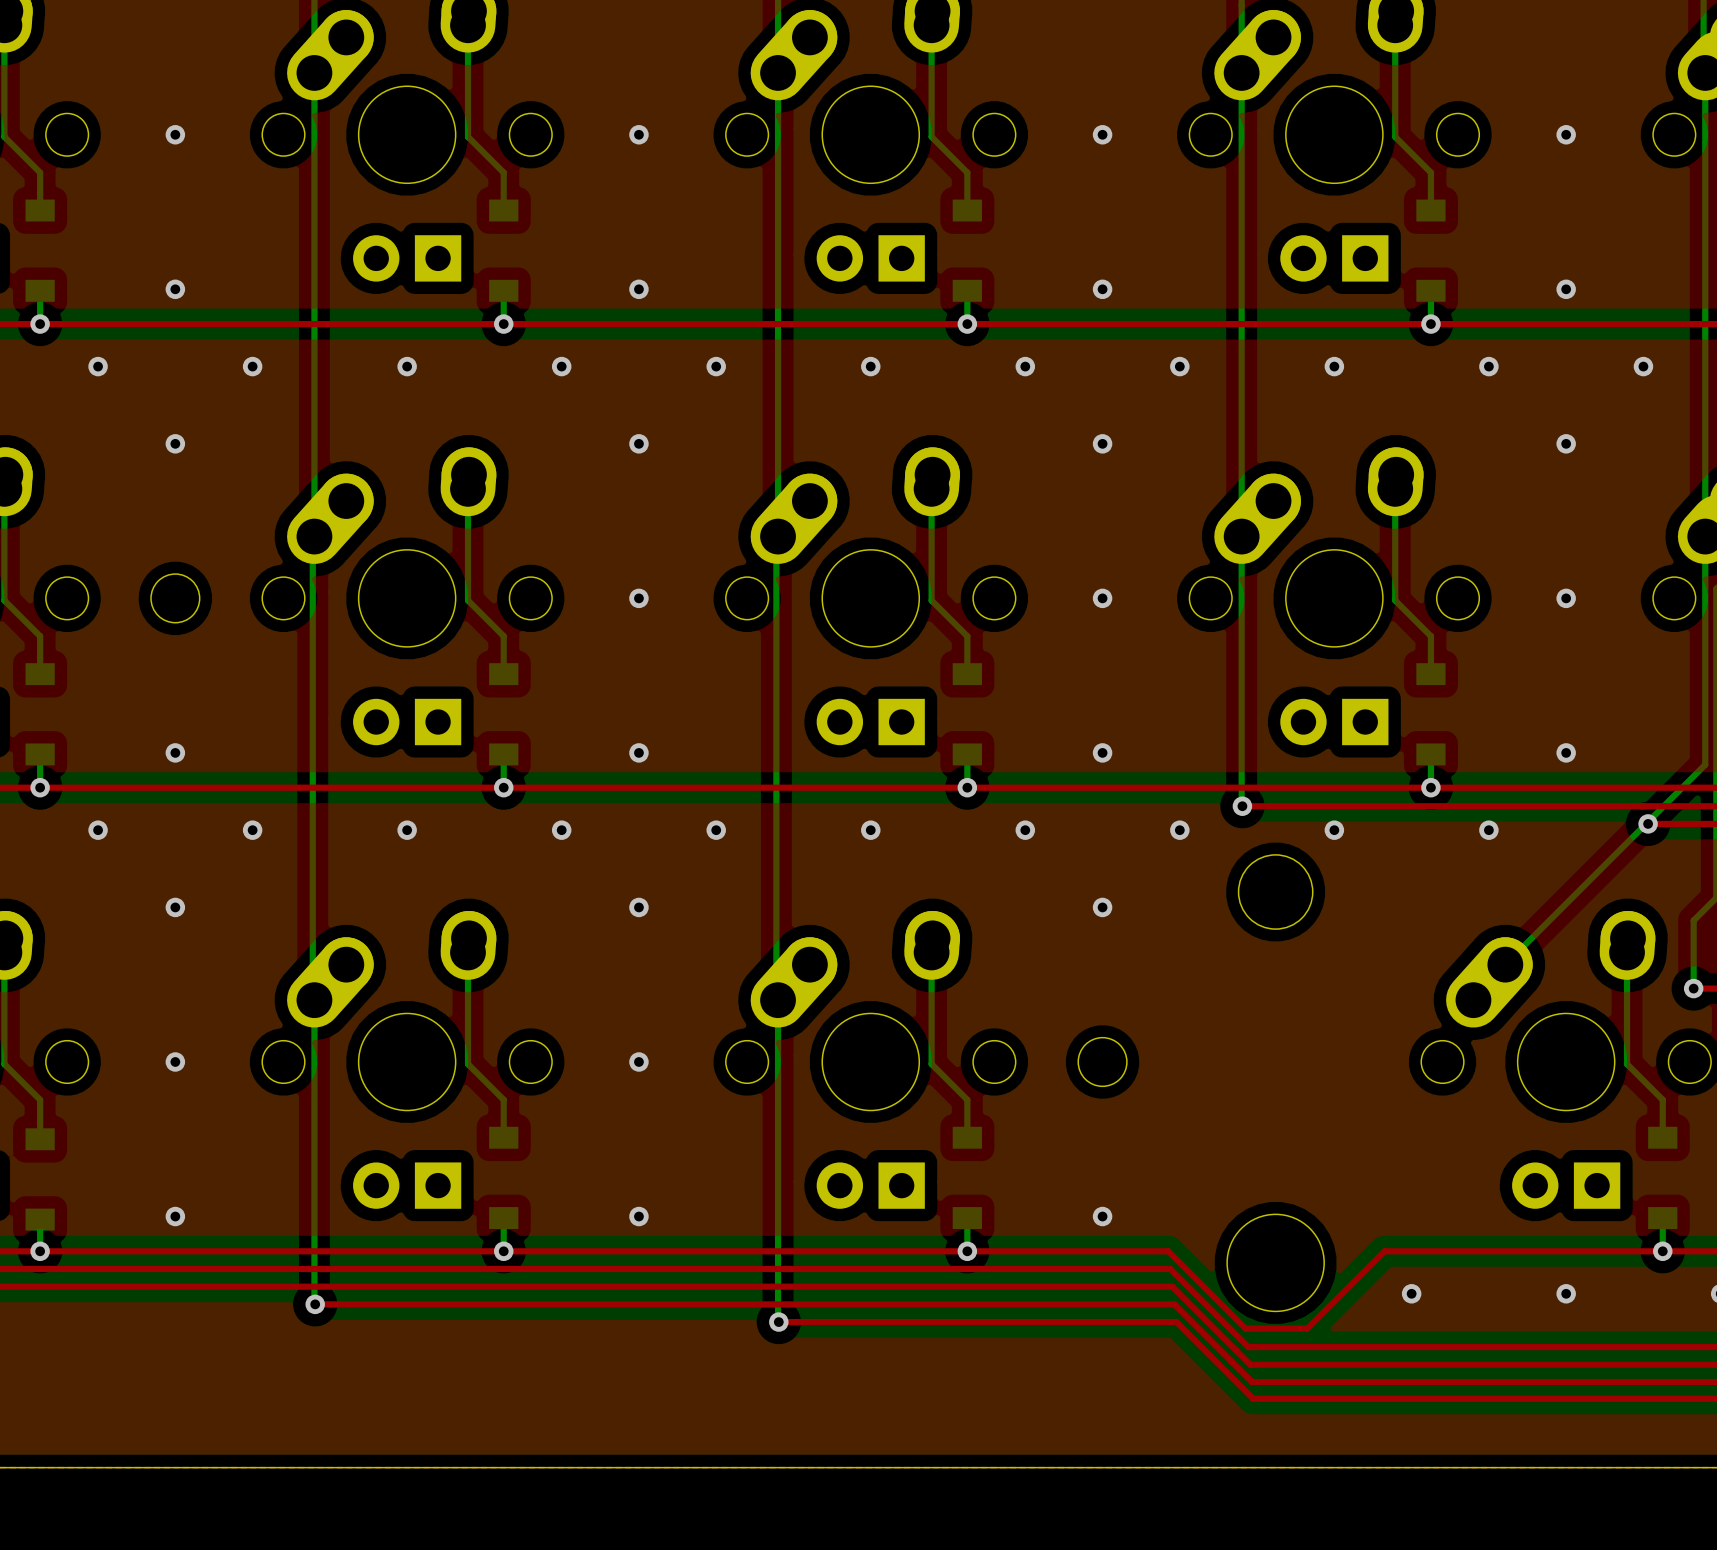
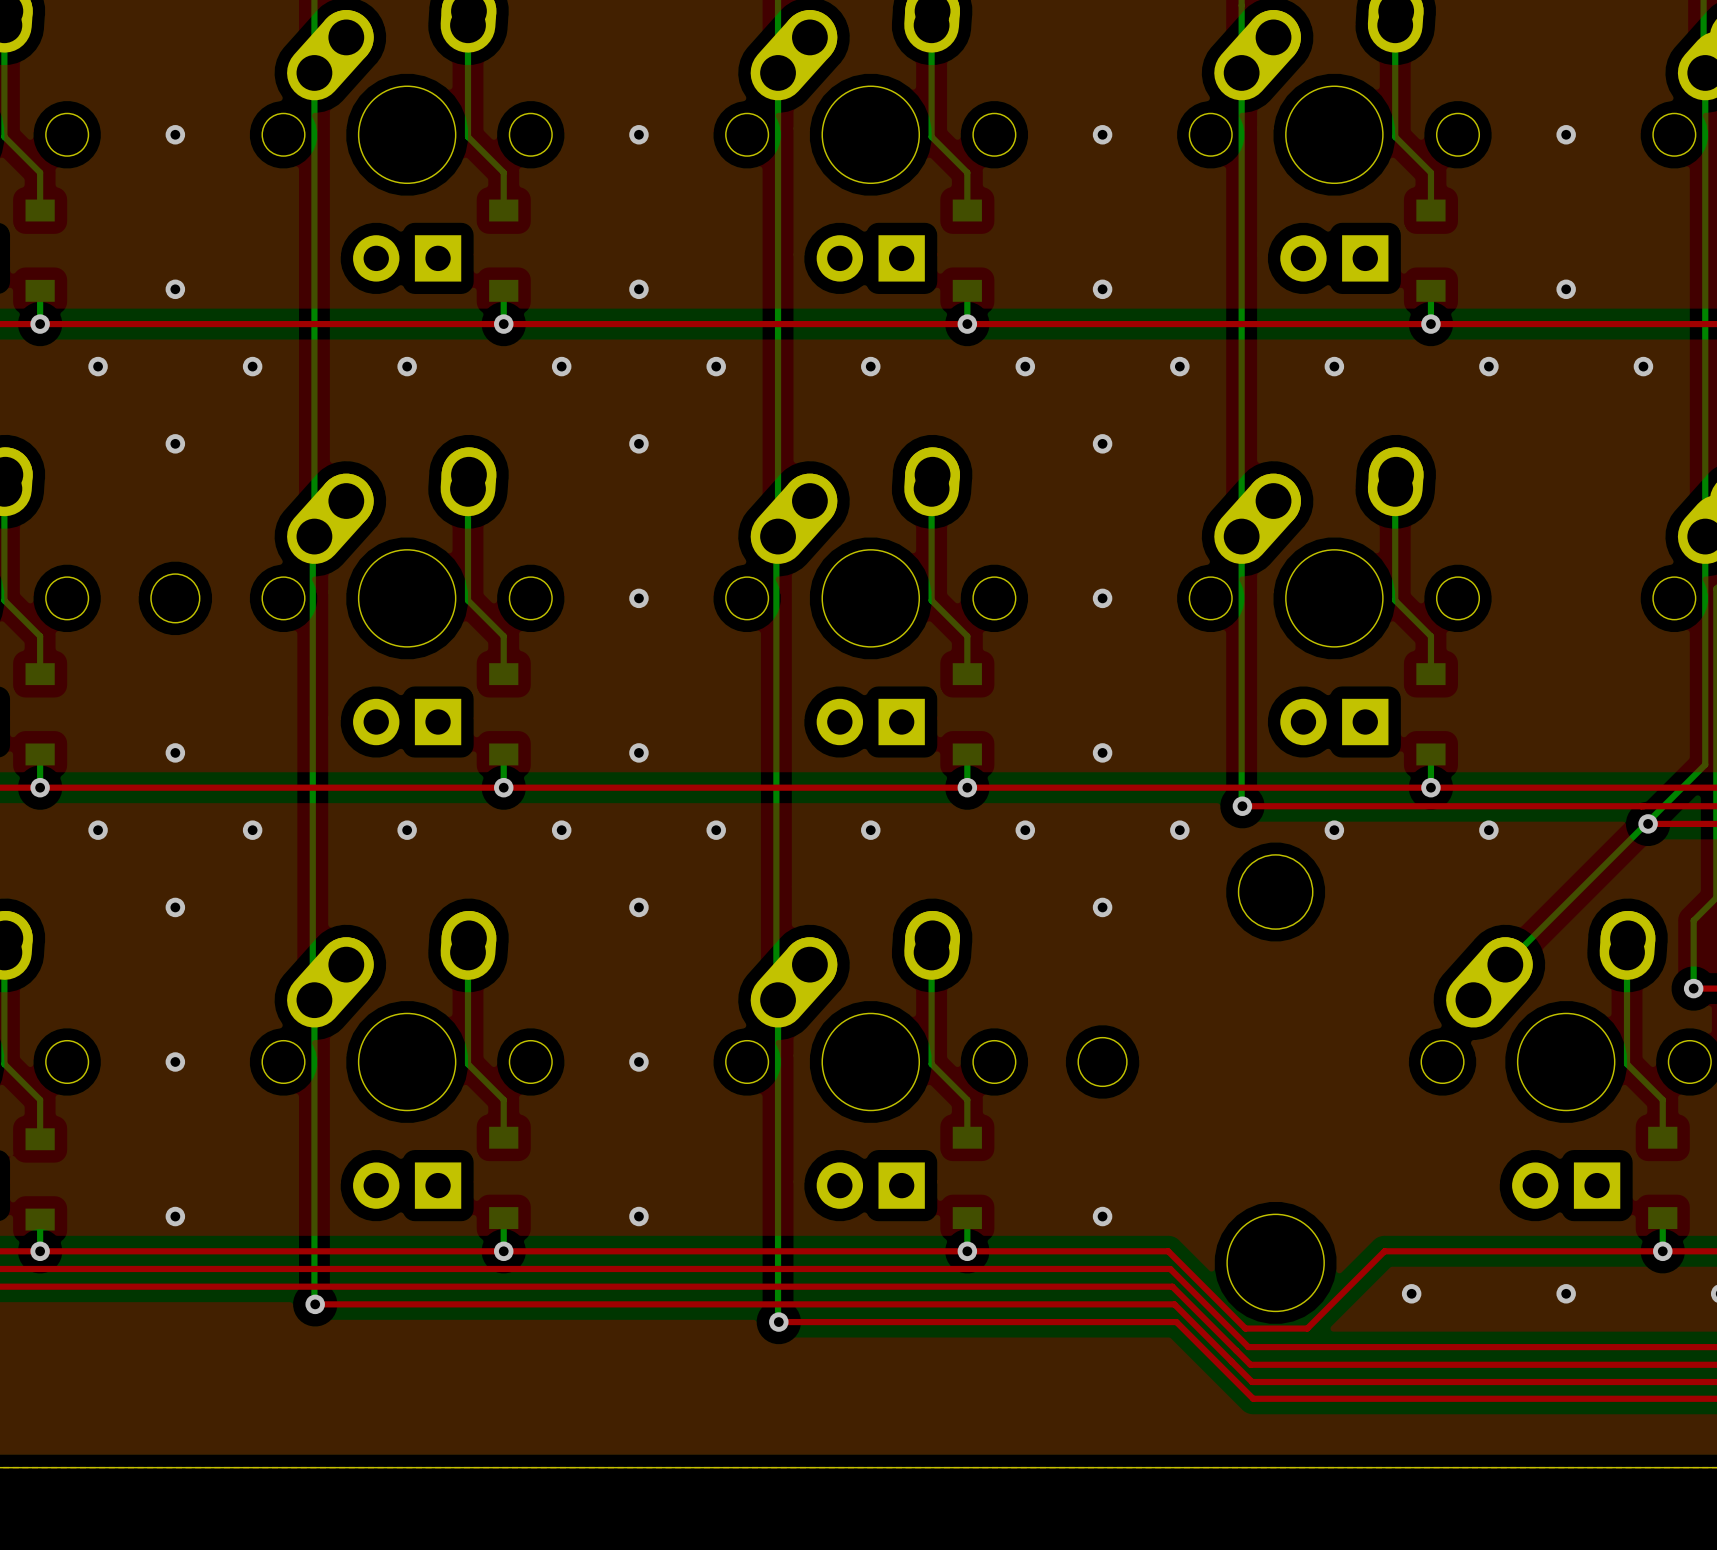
via: (1566, 443) -> none
via: (1566, 598) -> none
via: (1566, 752) -> none

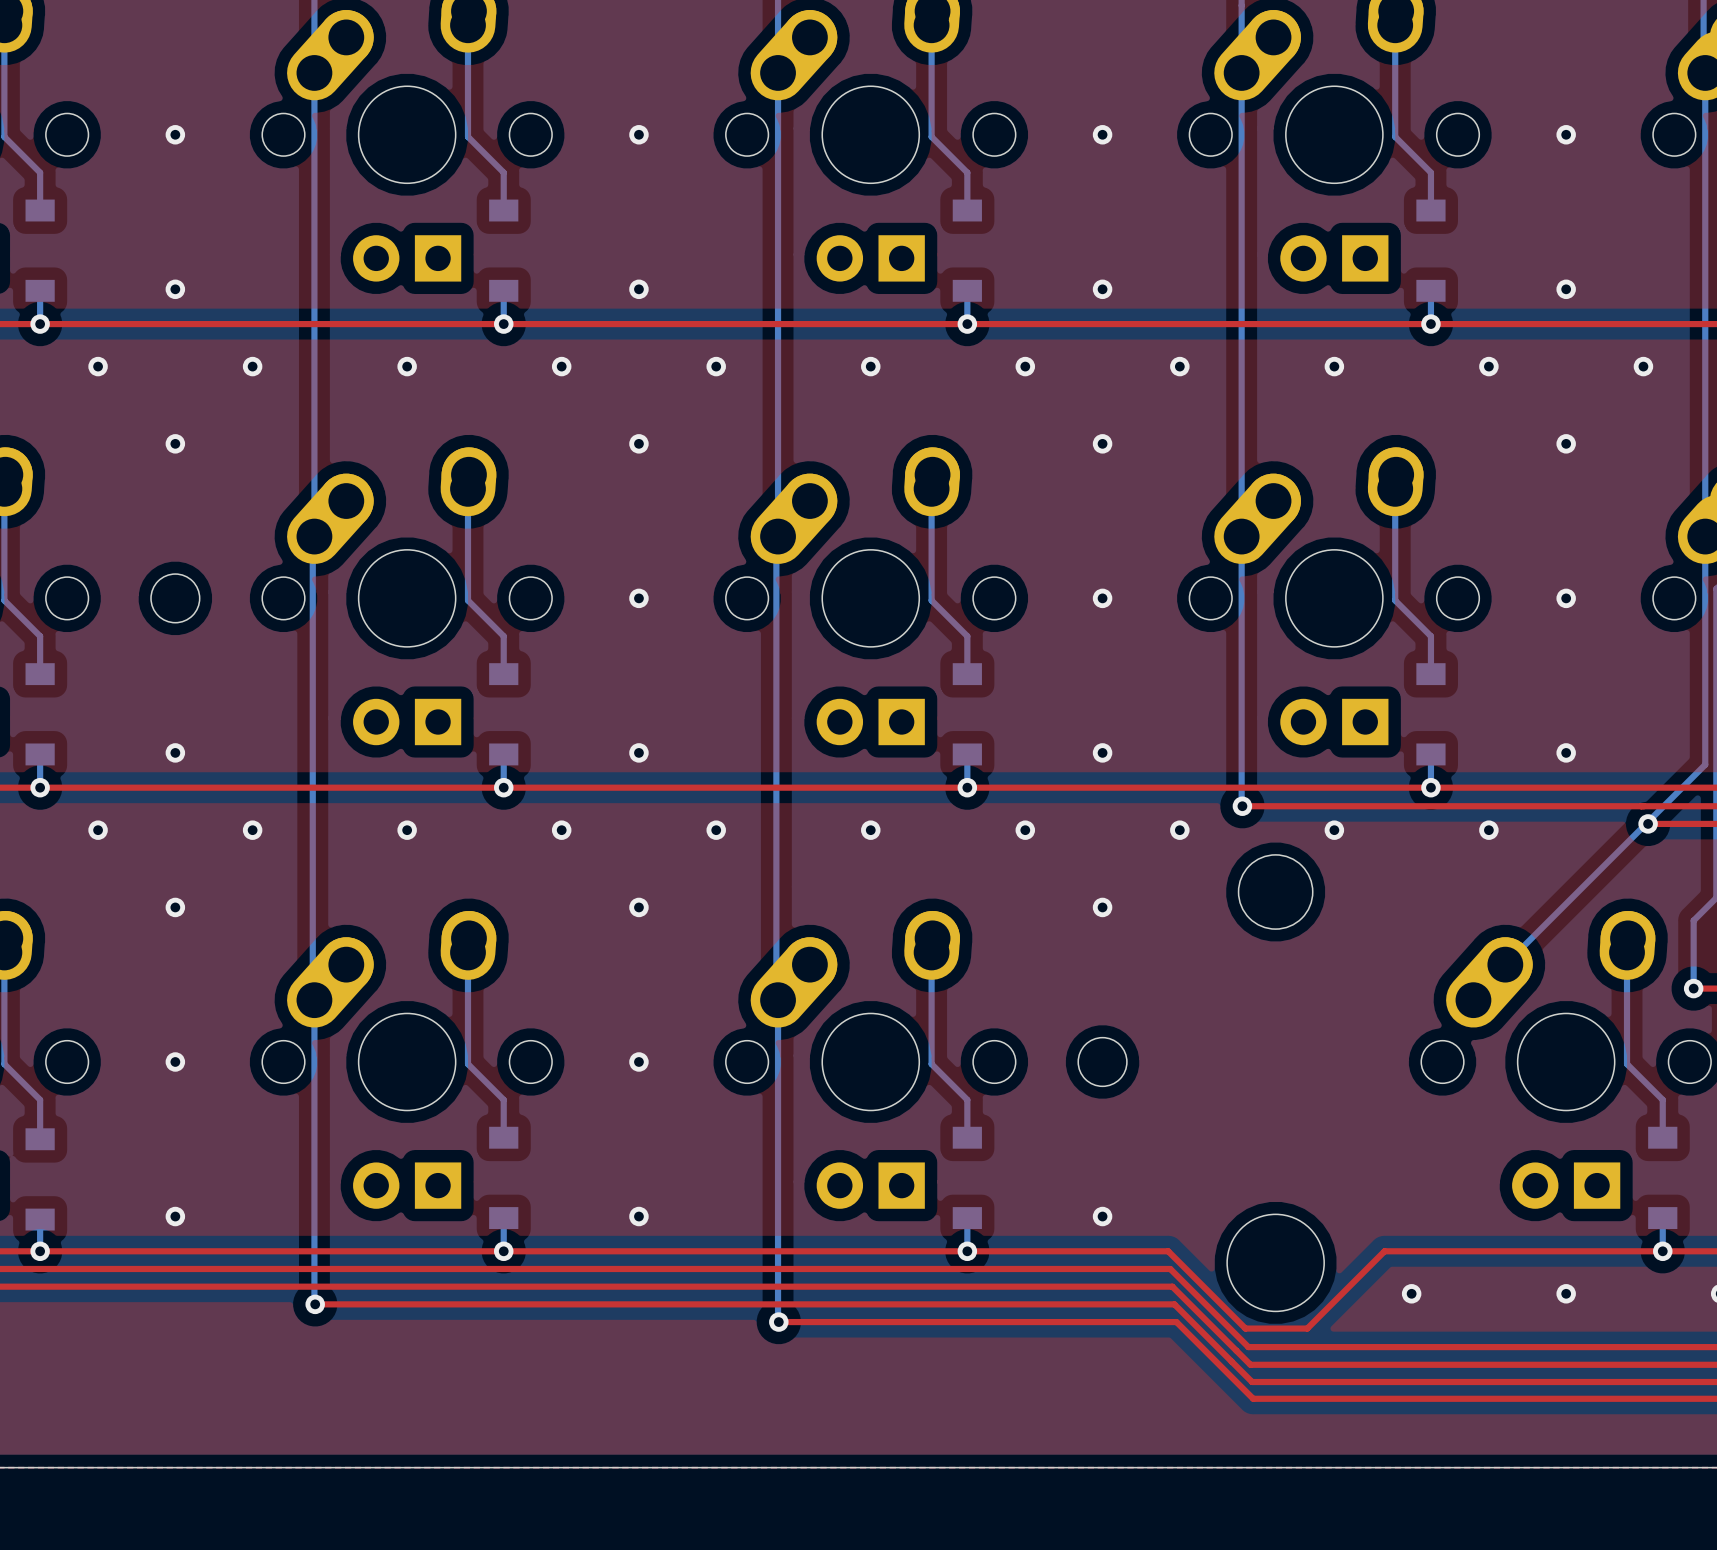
via: none -> (1566, 443)
via: none -> (1566, 598)
via: none -> (1566, 752)

